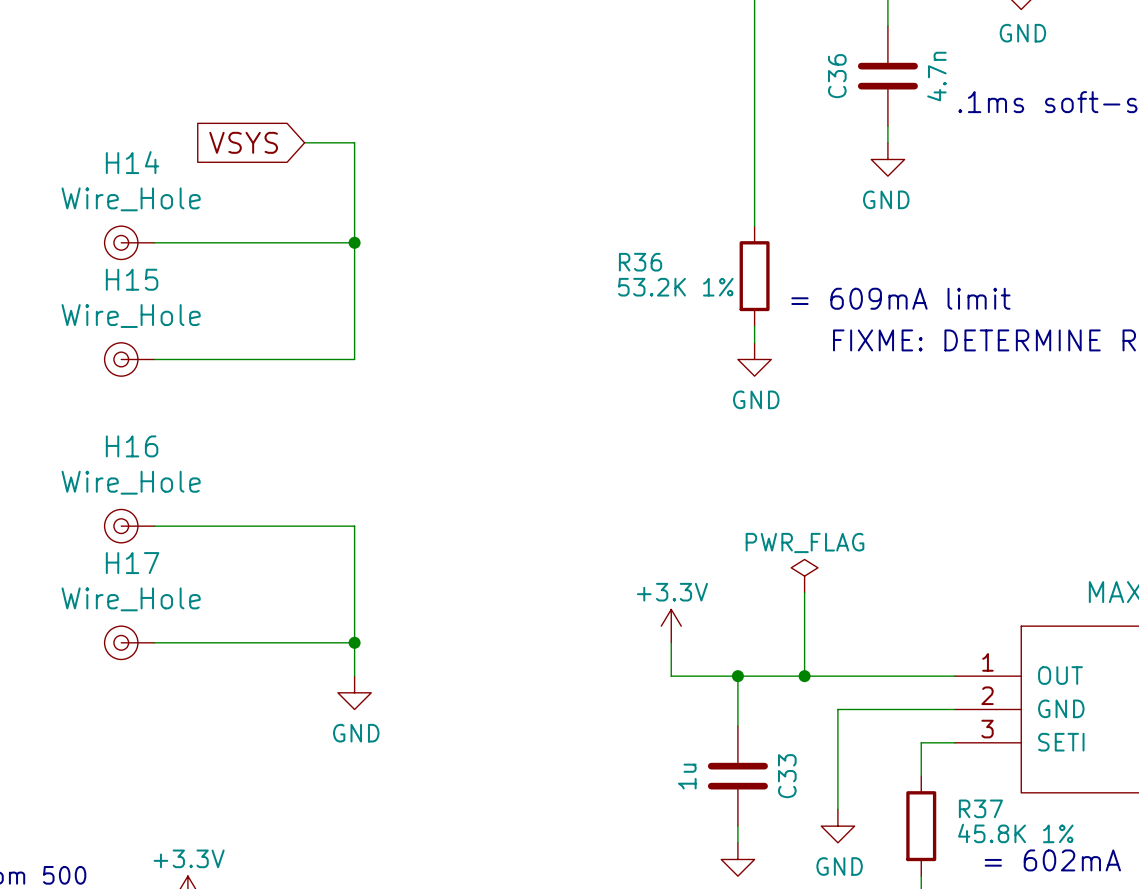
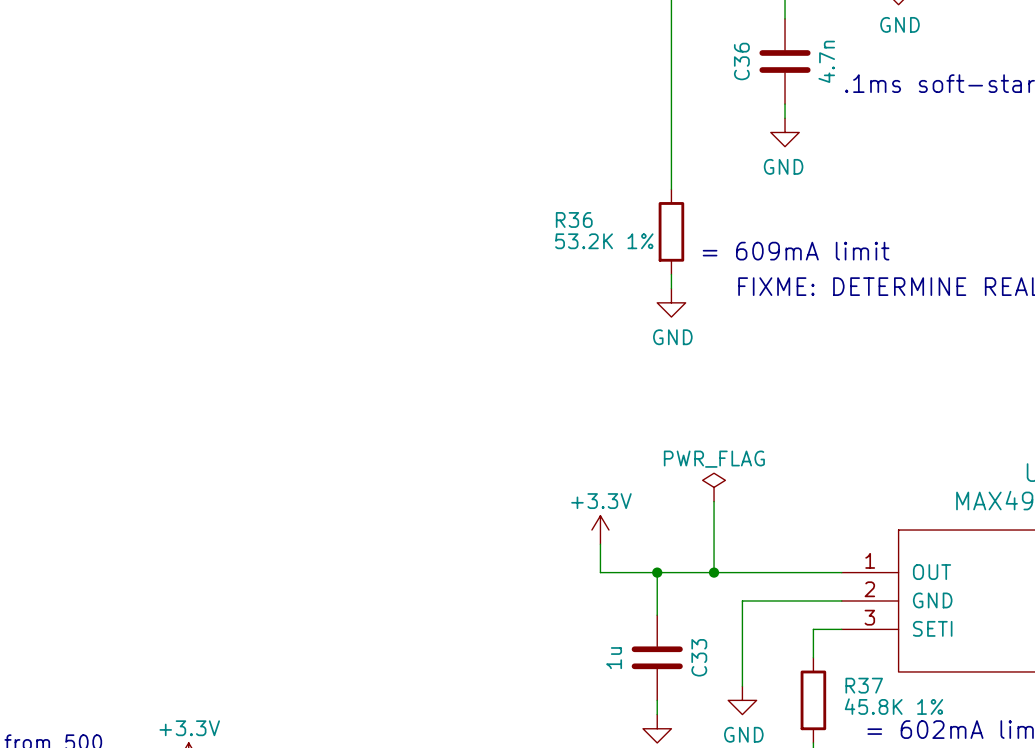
global label: VSYS (243, 142) -> none
wire: (304, 142) (354, 142) (354, 359) (154, 359) -> none
H14: Wire_Hole (129, 242) -> none
wire: (154, 242) (354, 242) -> none
junction: (354, 242) -> none
H15: Wire_Hole (129, 359) -> none
H16: Wire_Hole (129, 526) -> none
wire: (154, 526) (354, 526) (354, 676) -> none
H17: Wire_Hole (129, 642) -> none
wire: (154, 642) (354, 642) -> none
junction: (354, 642) -> none
power symbol: GND (354, 692) -> none

